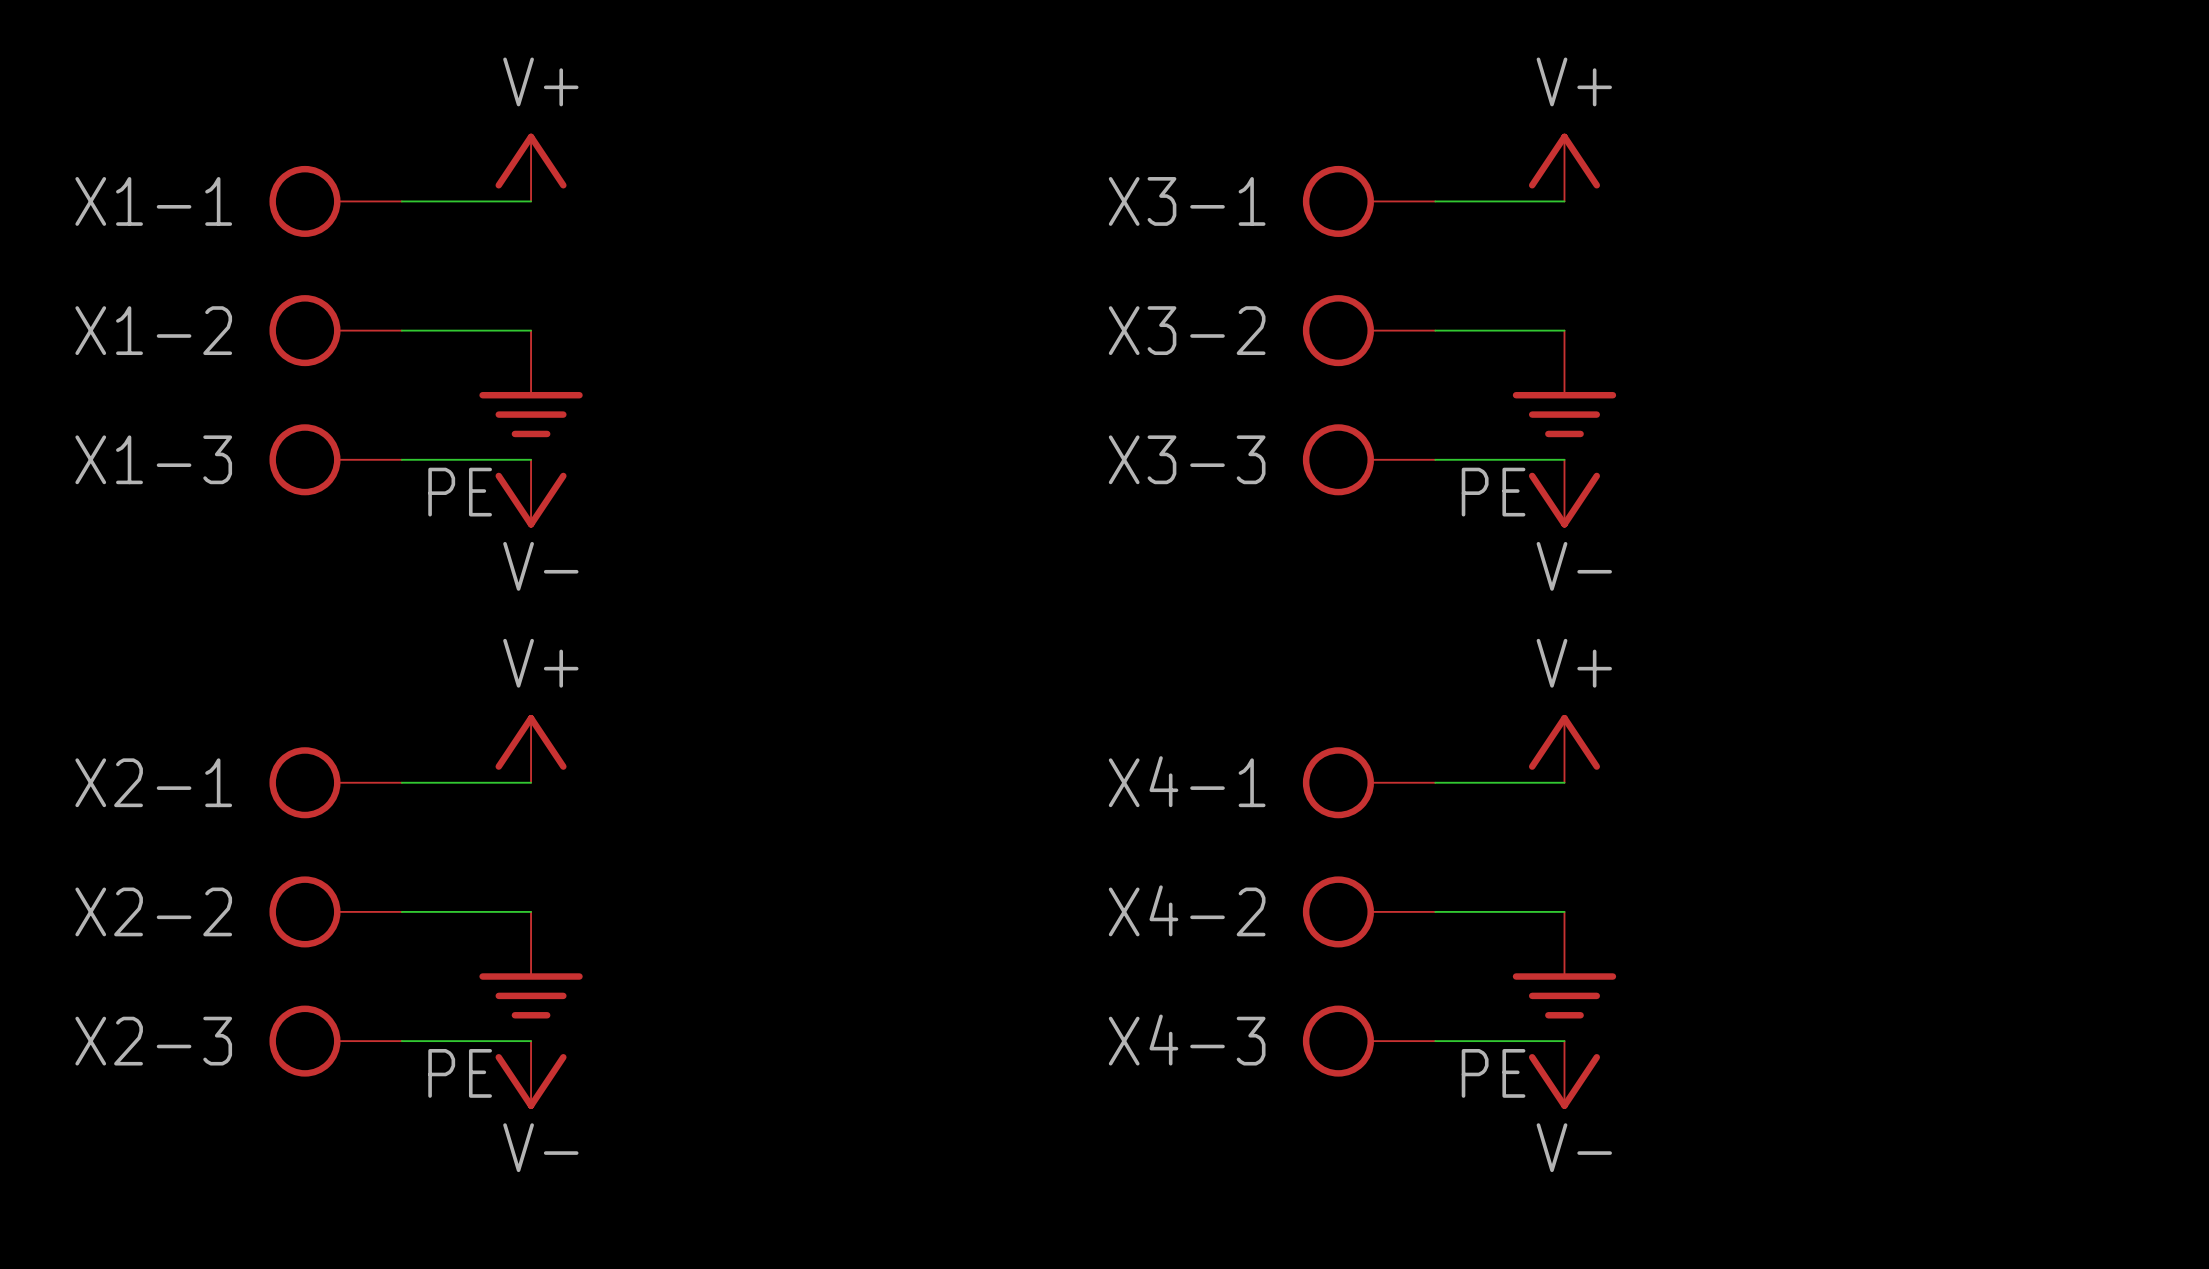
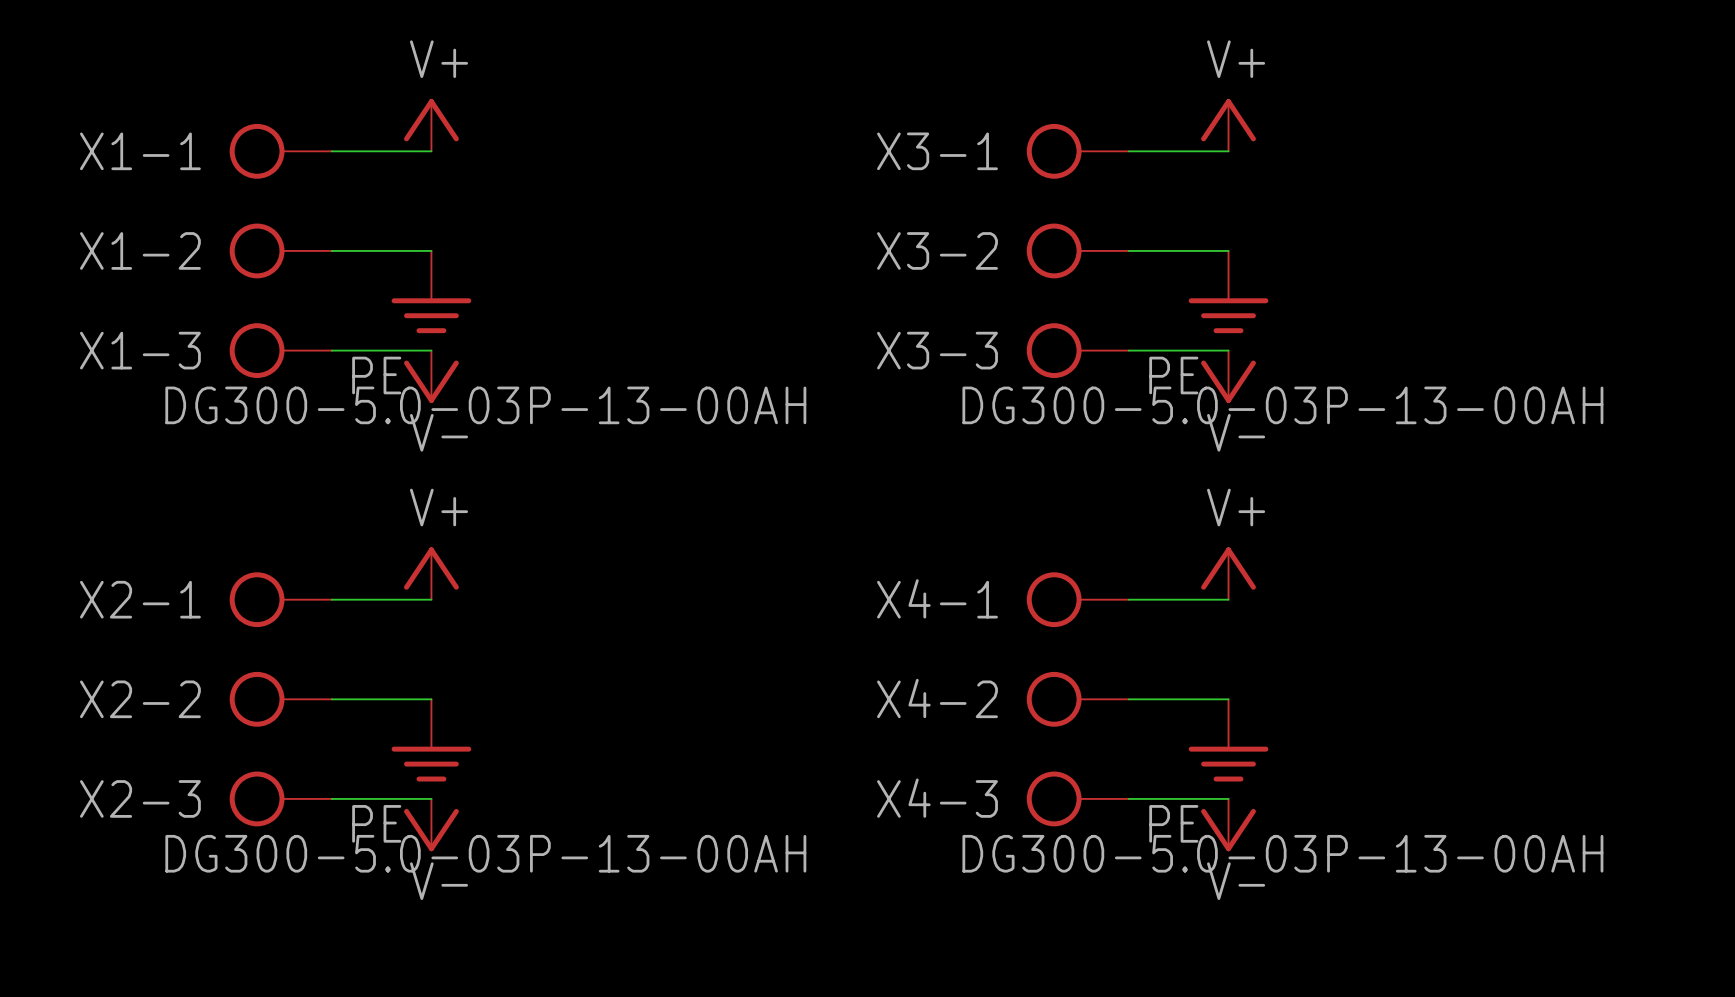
X1-3 value: none -> DG300-5.0-03P-13-00AH (485, 405)
X3-3 value: none -> DG300-5.0-03P-13-00AH (1282, 405)
X2-3 value: none -> DG300-5.0-03P-13-00AH (485, 853)
X4-3 value: none -> DG300-5.0-03P-13-00AH (1282, 853)

